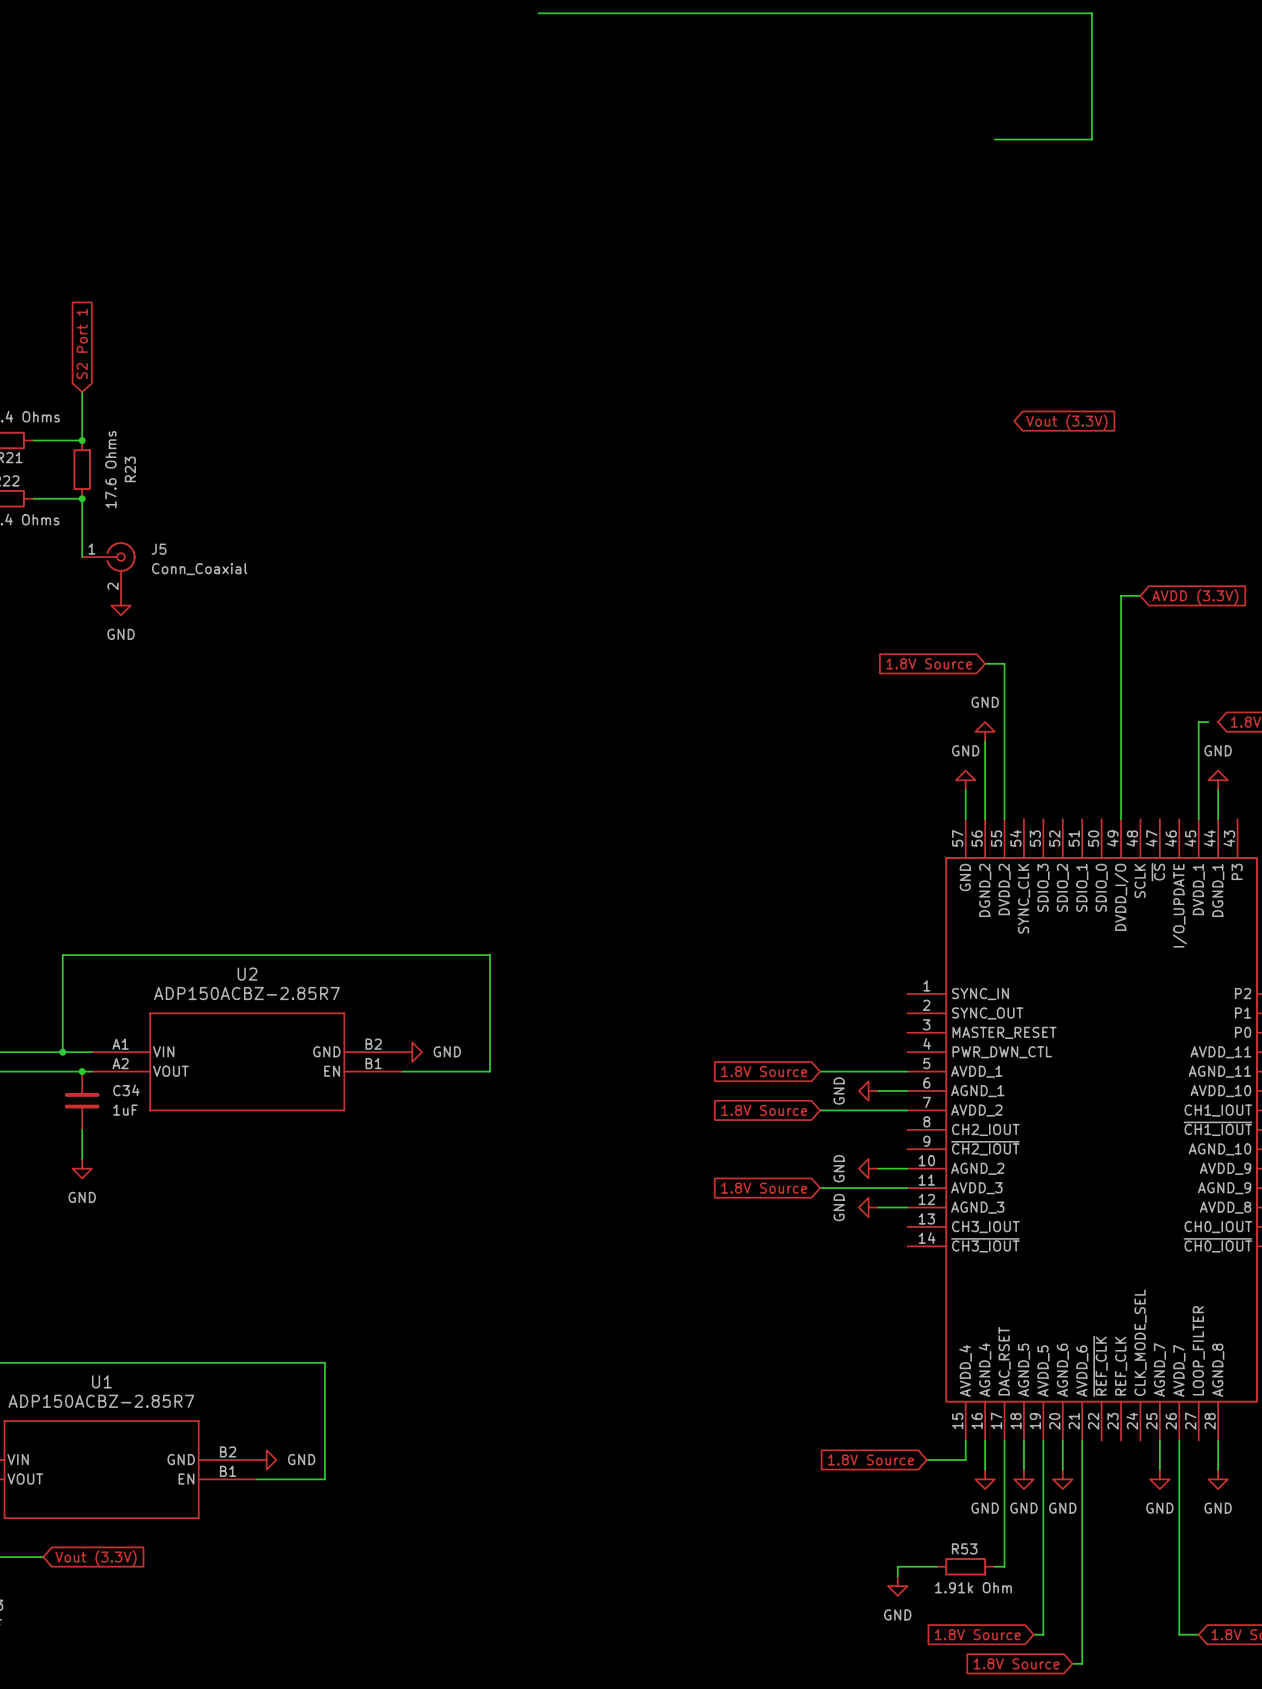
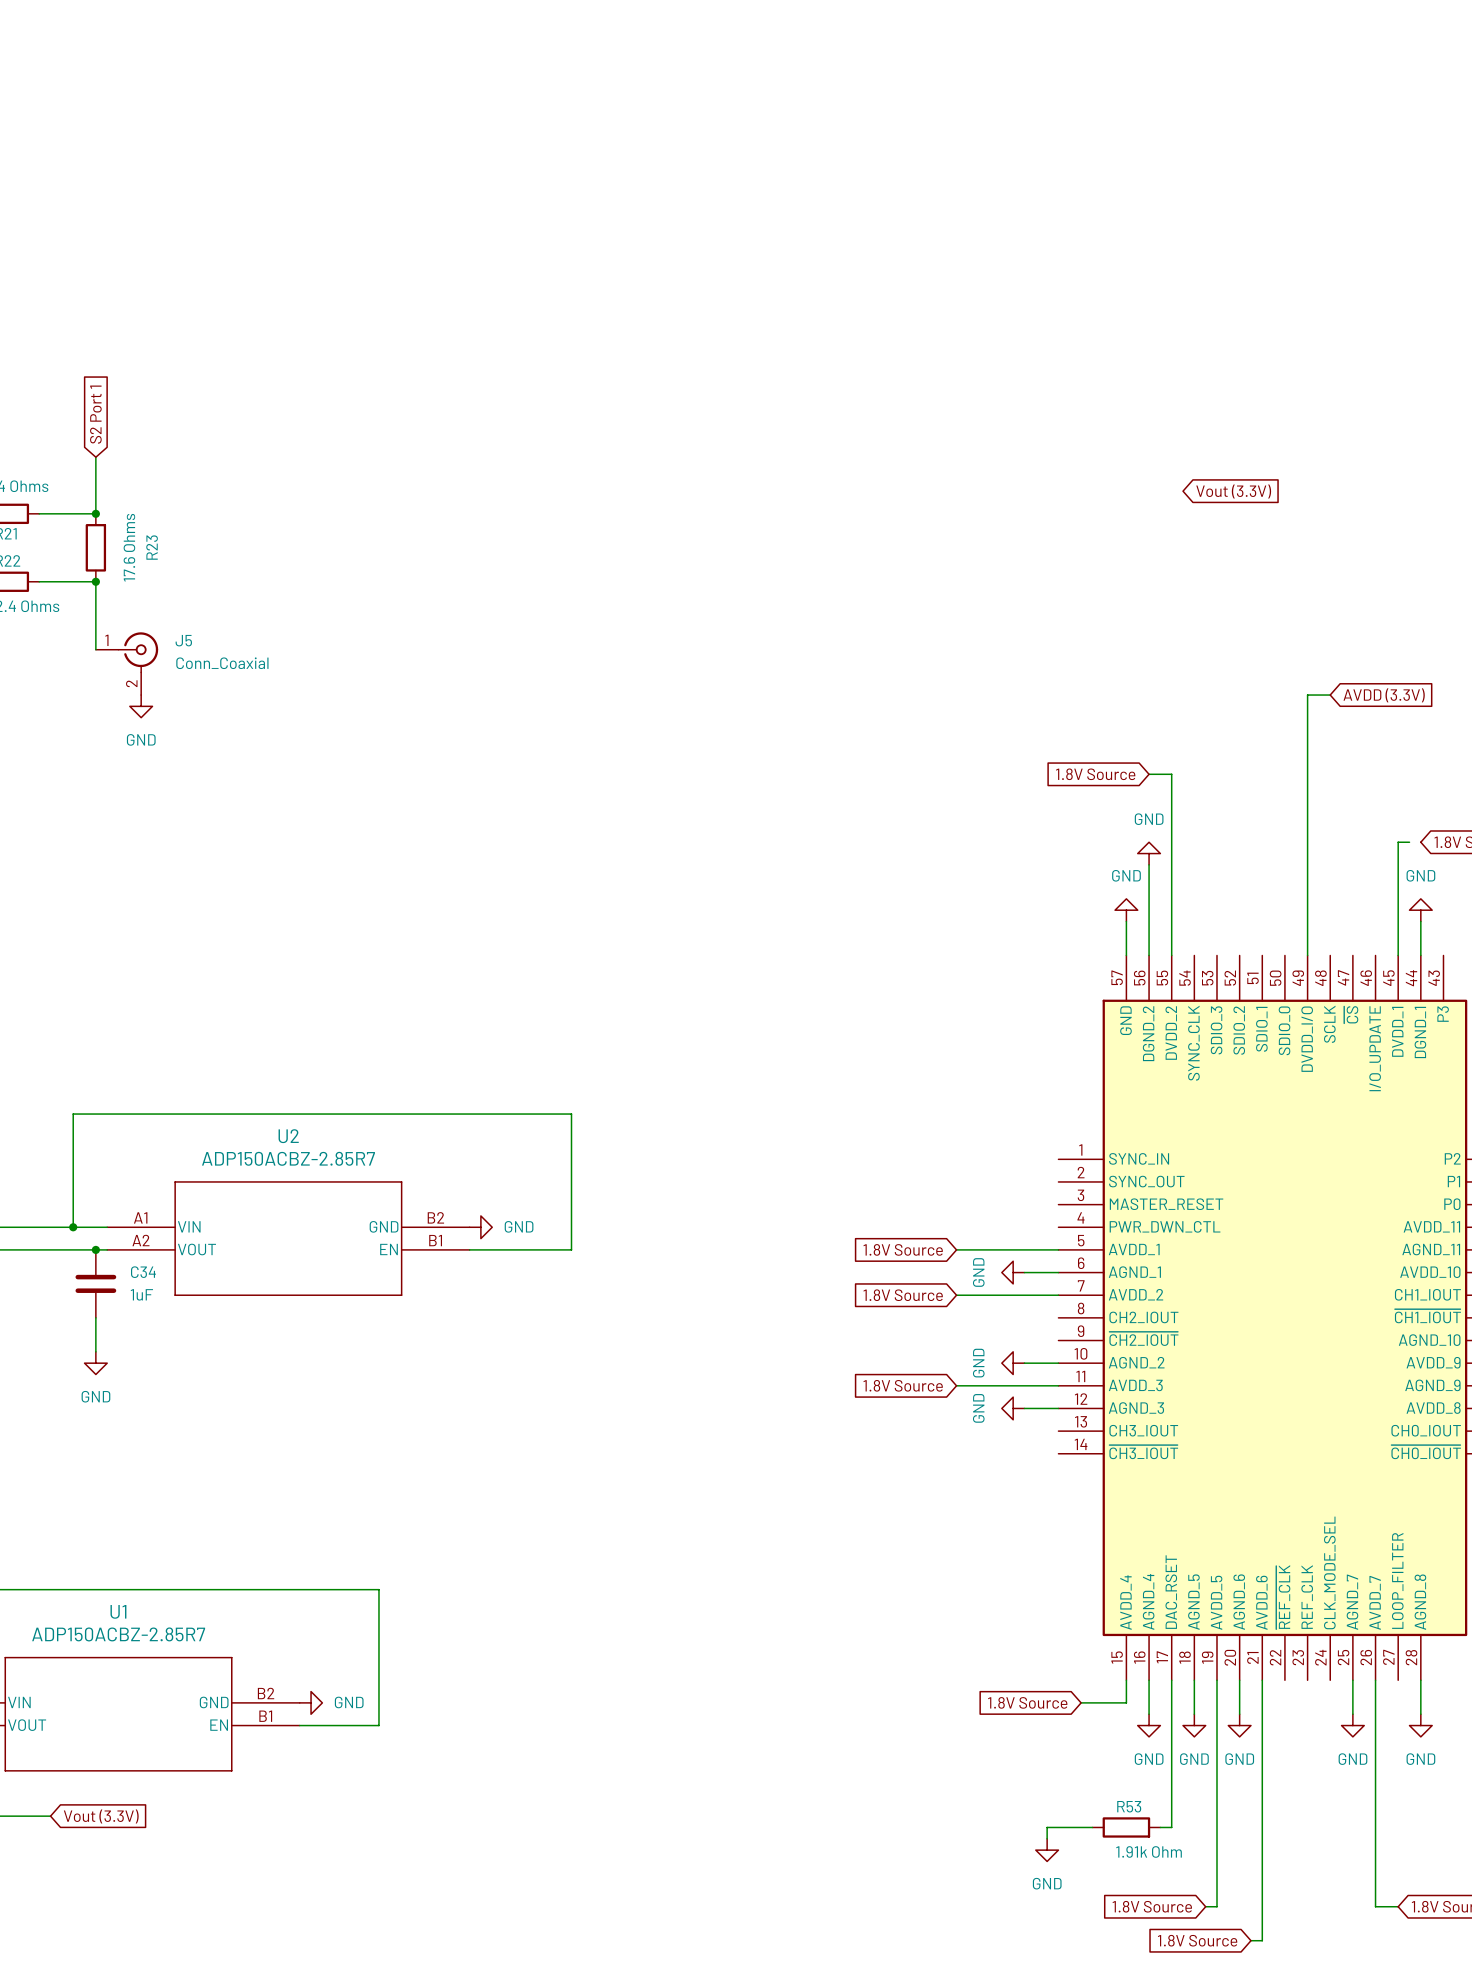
wire: (538, 13) (1091, 13) (1091, 139) (994, 139) -> none

